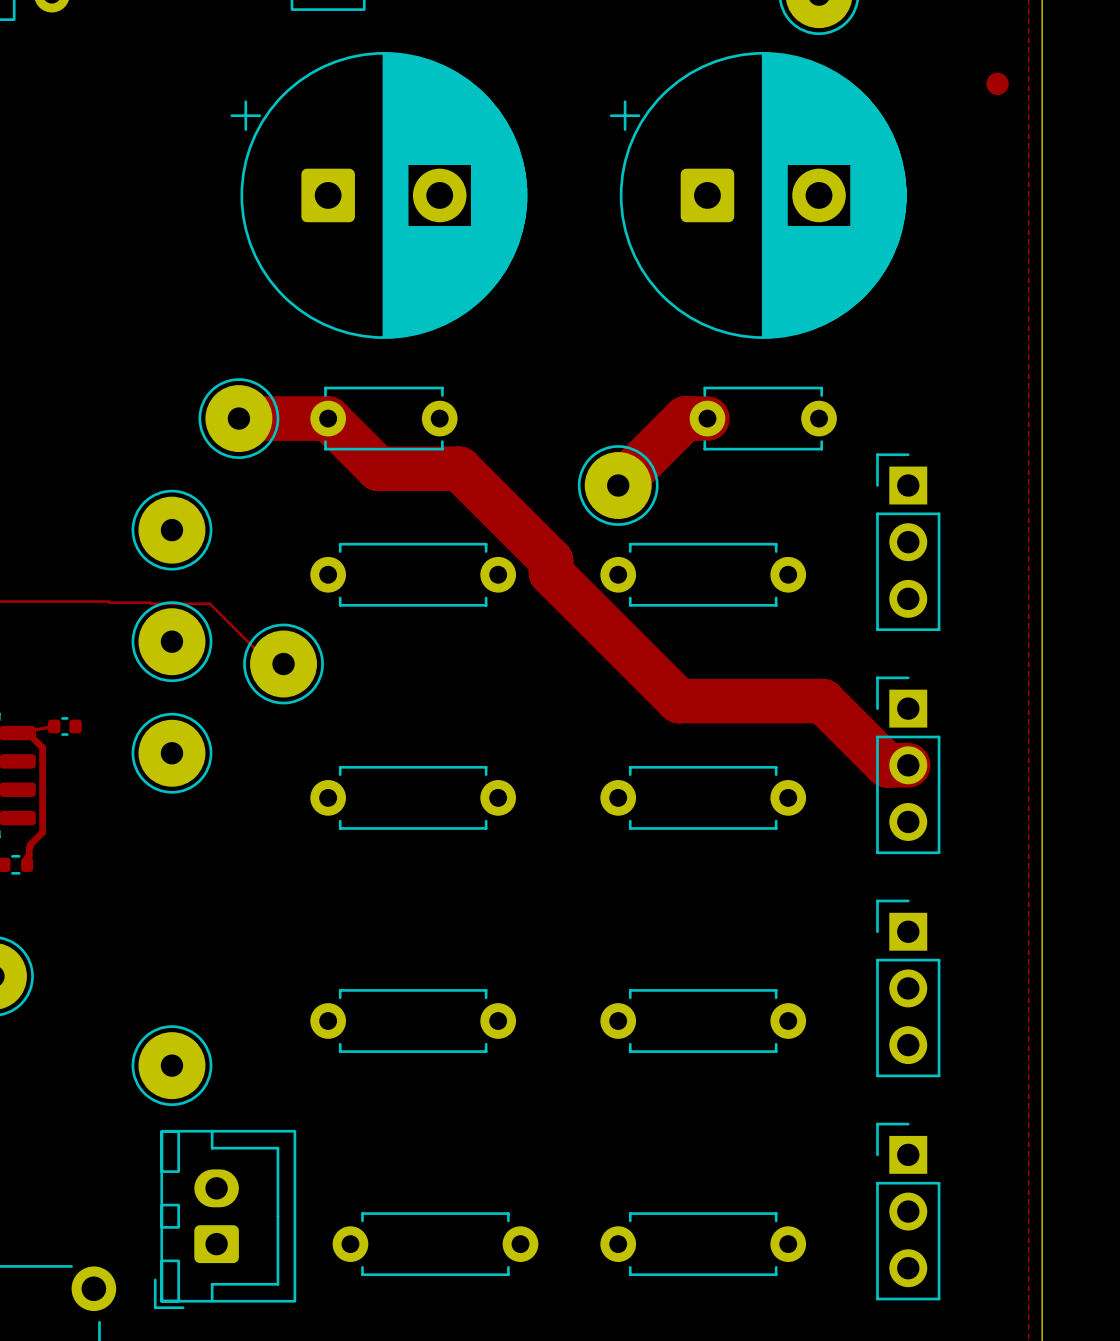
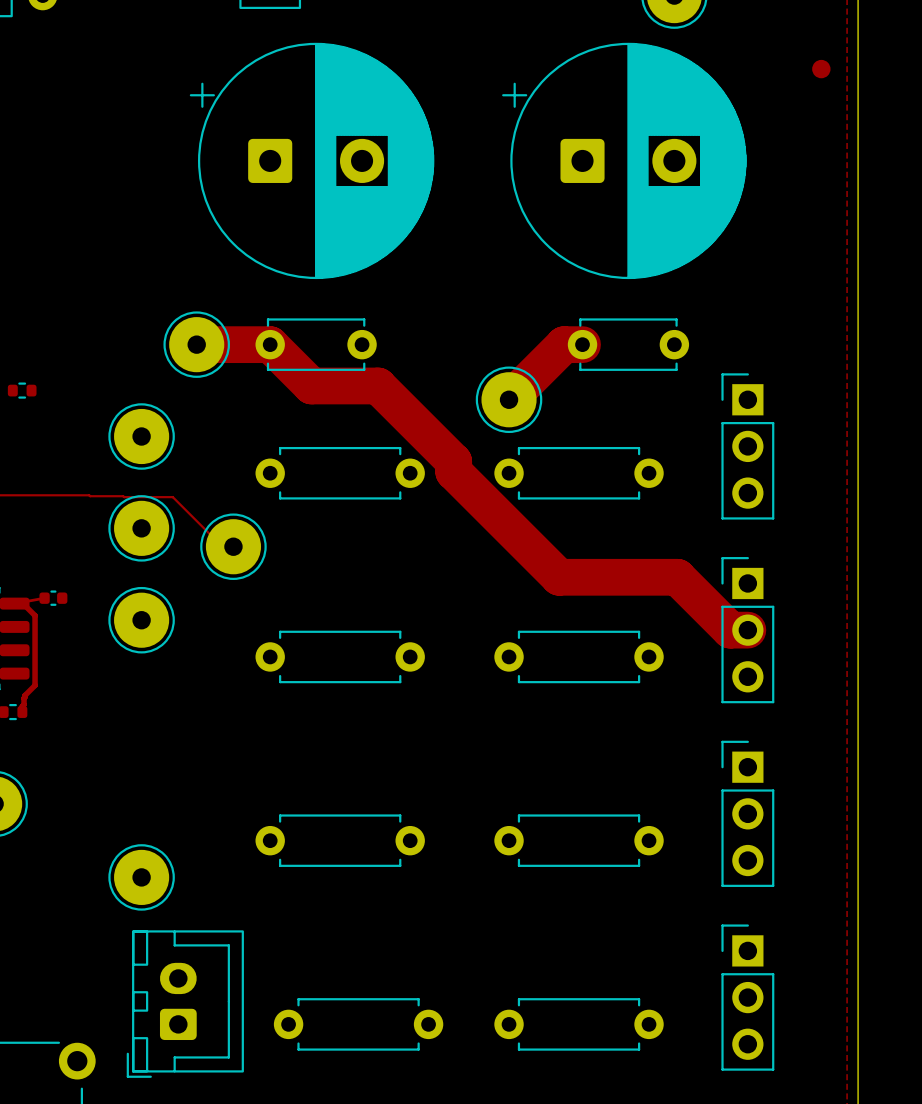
part: none -> (22, 390)

